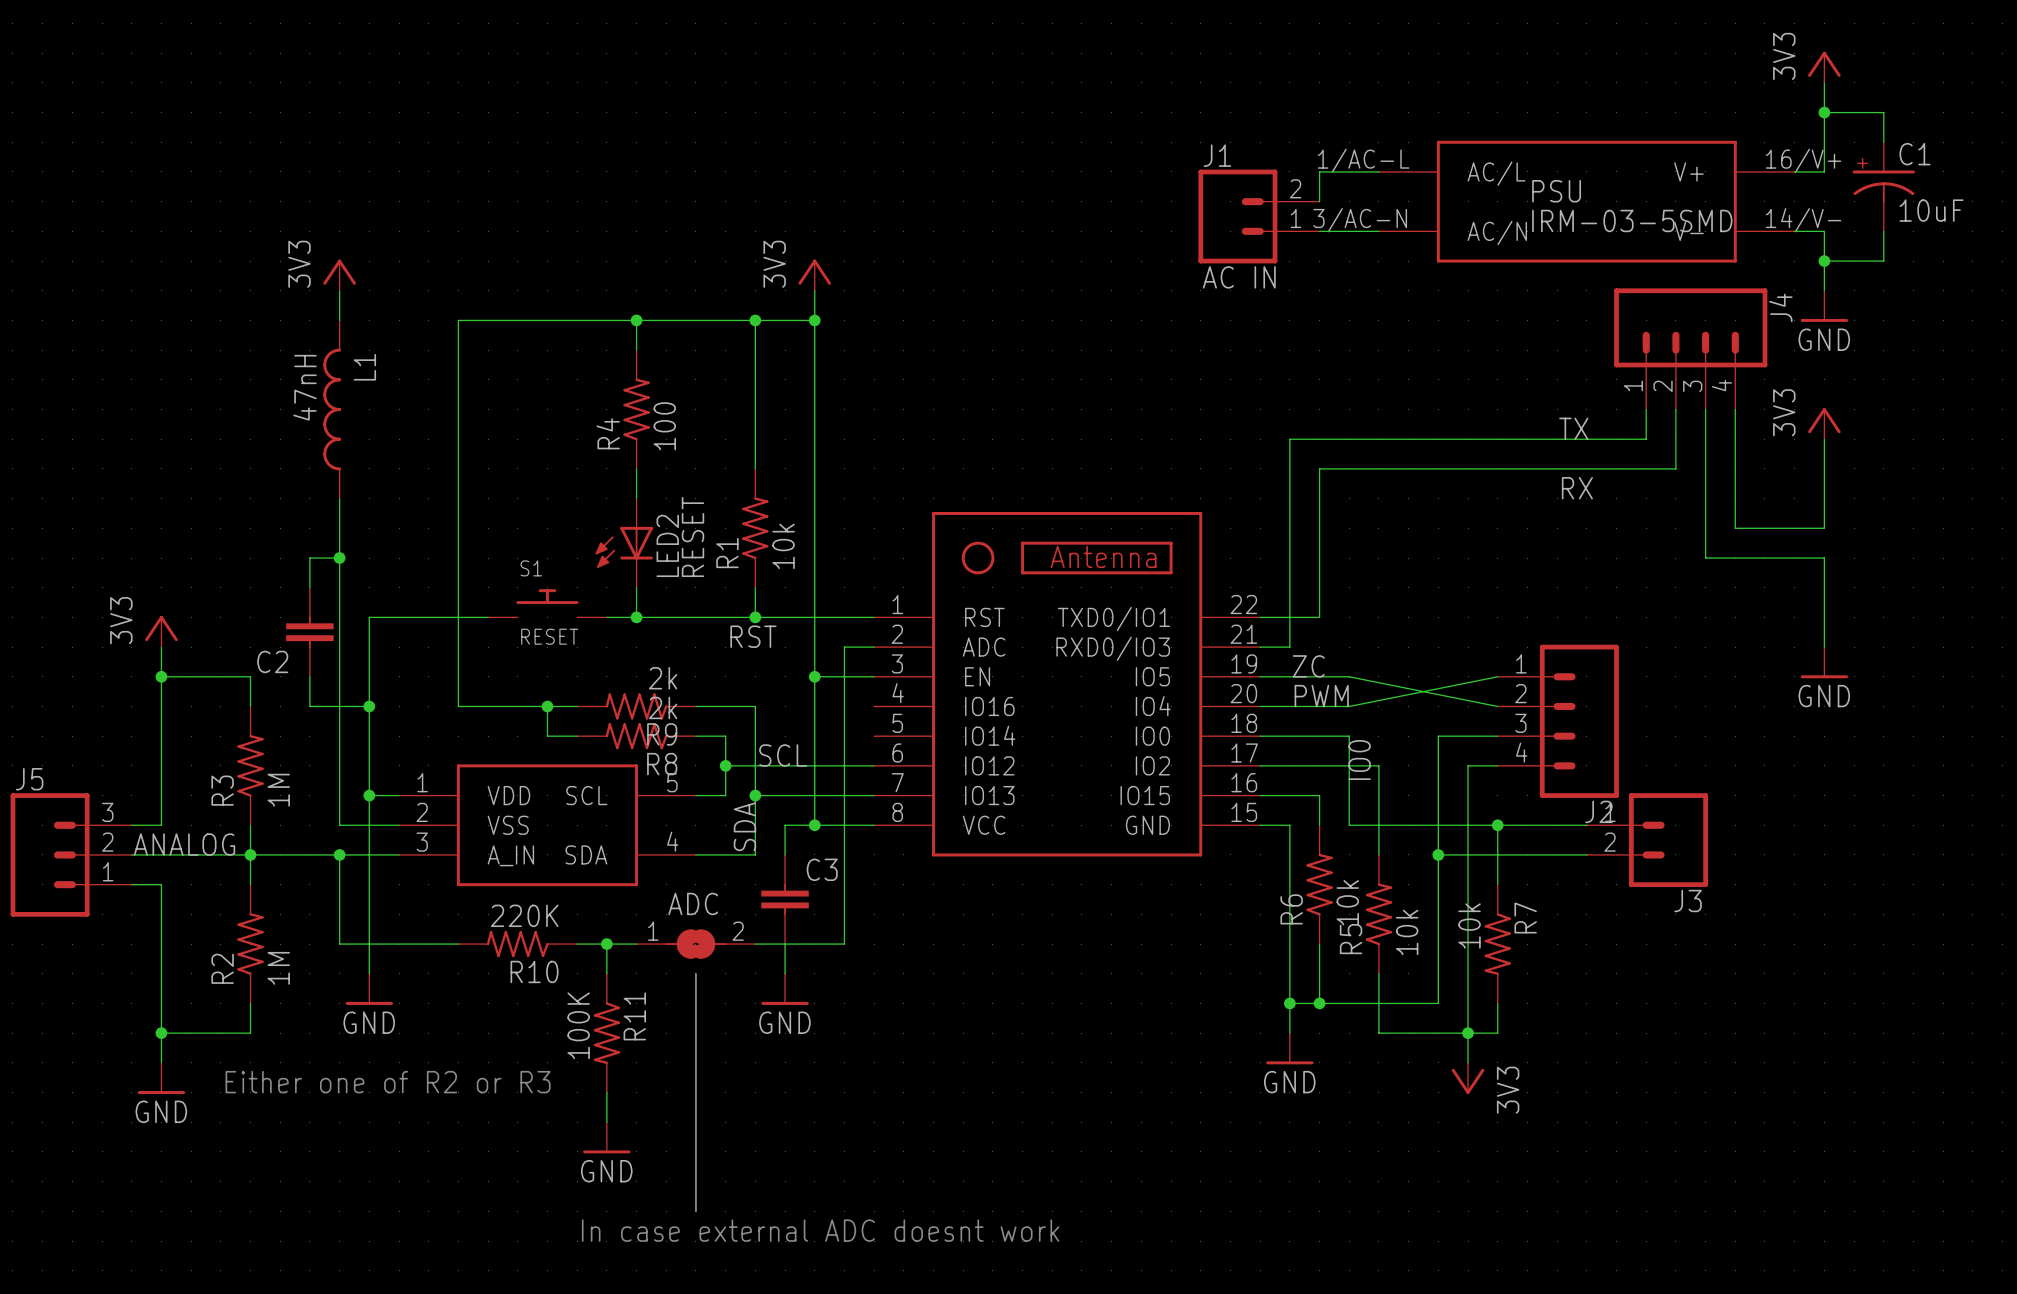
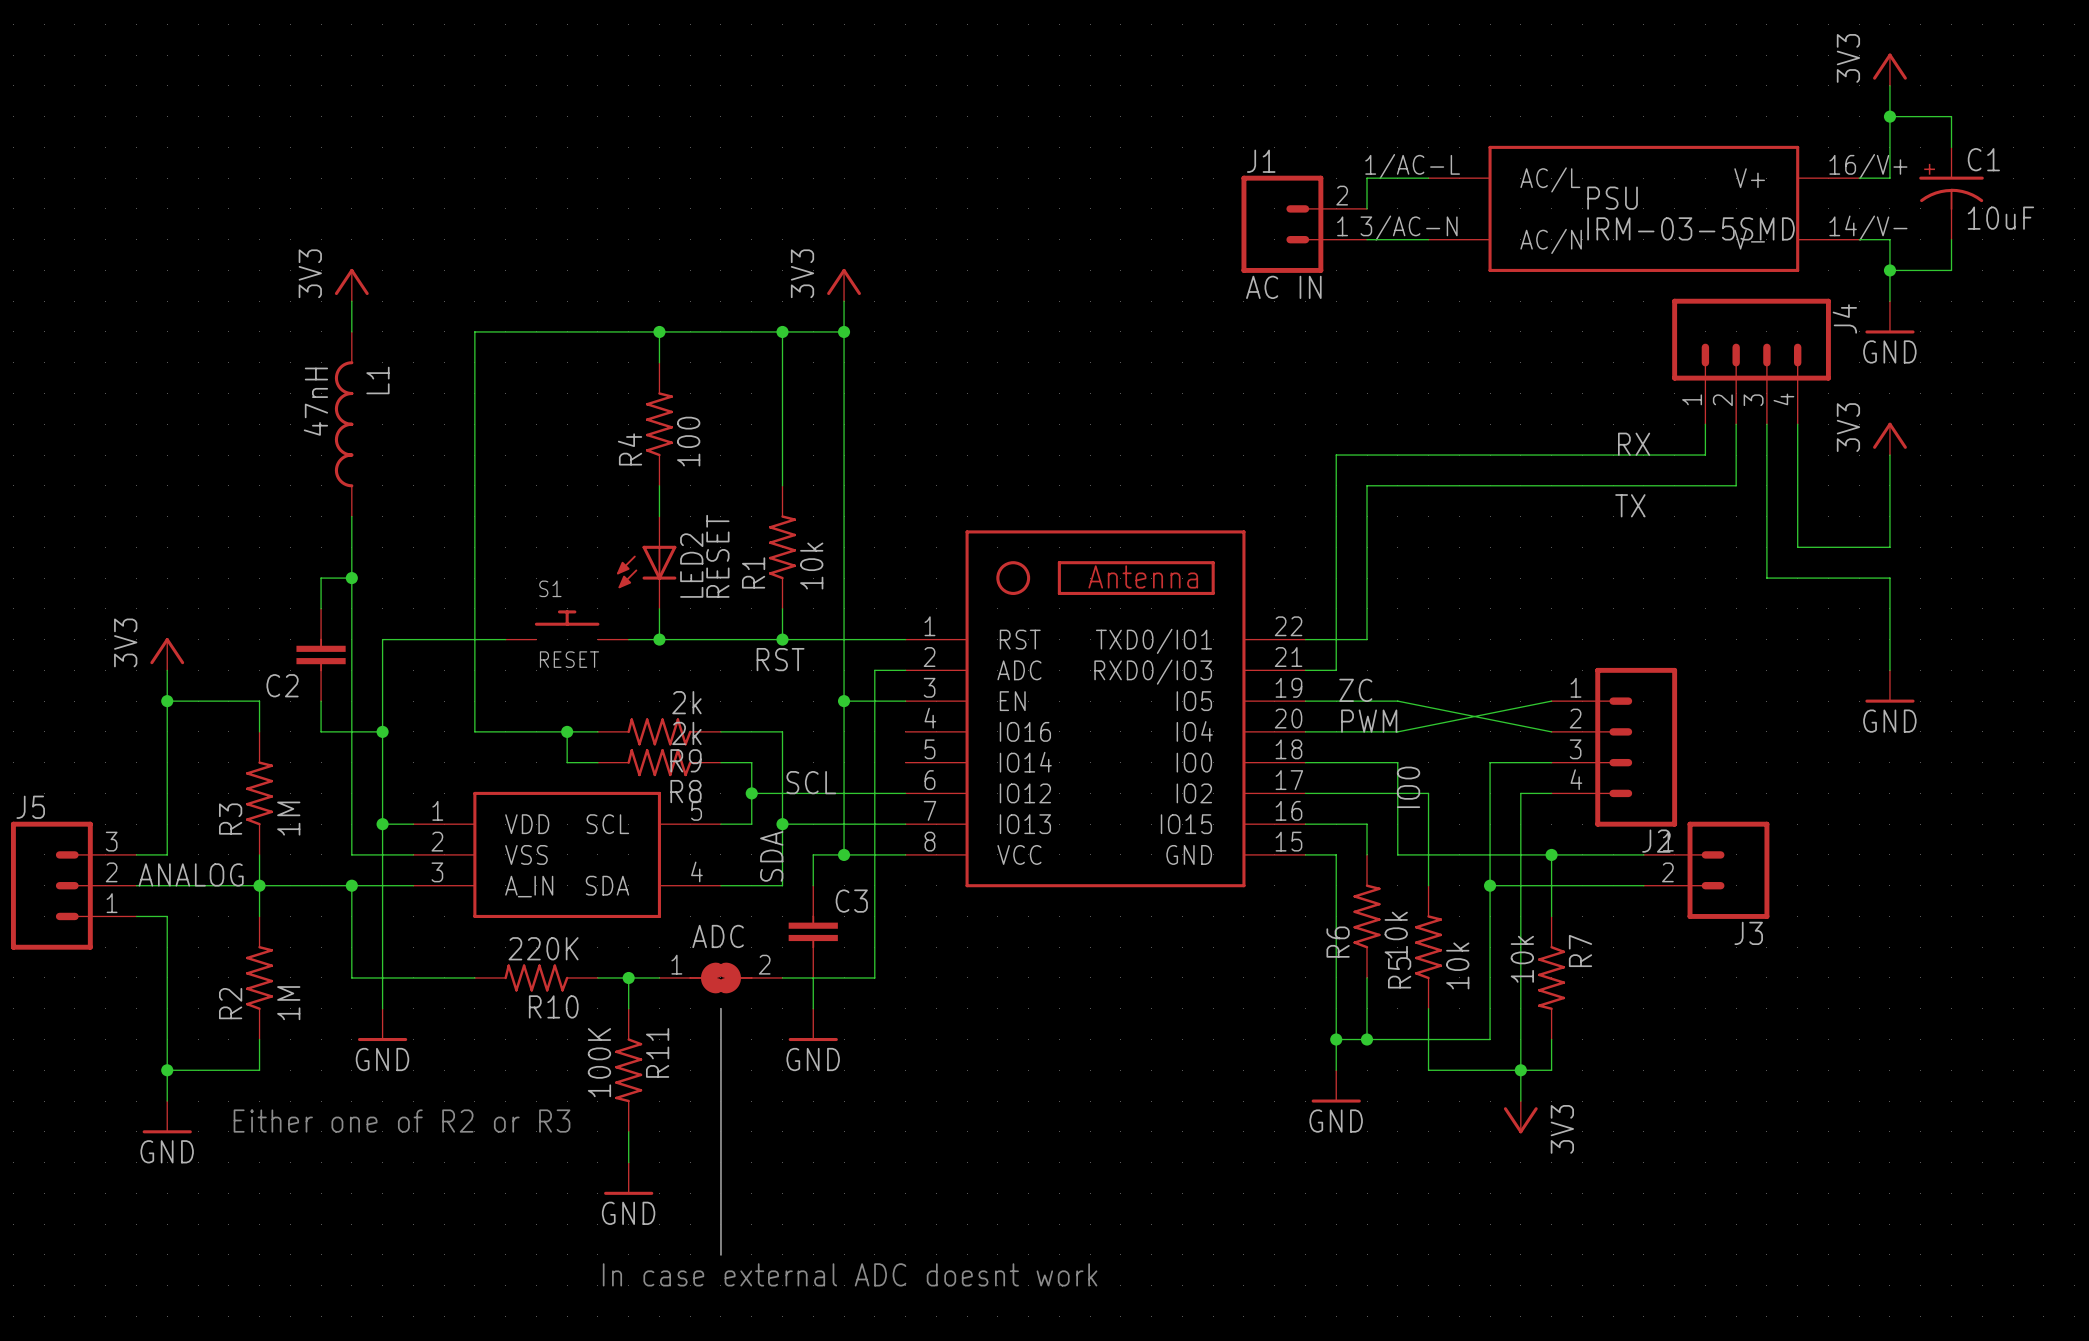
label: TX (1573, 428) -> RX (1634, 444)
label: RX (1577, 488) -> TX (1630, 505)

